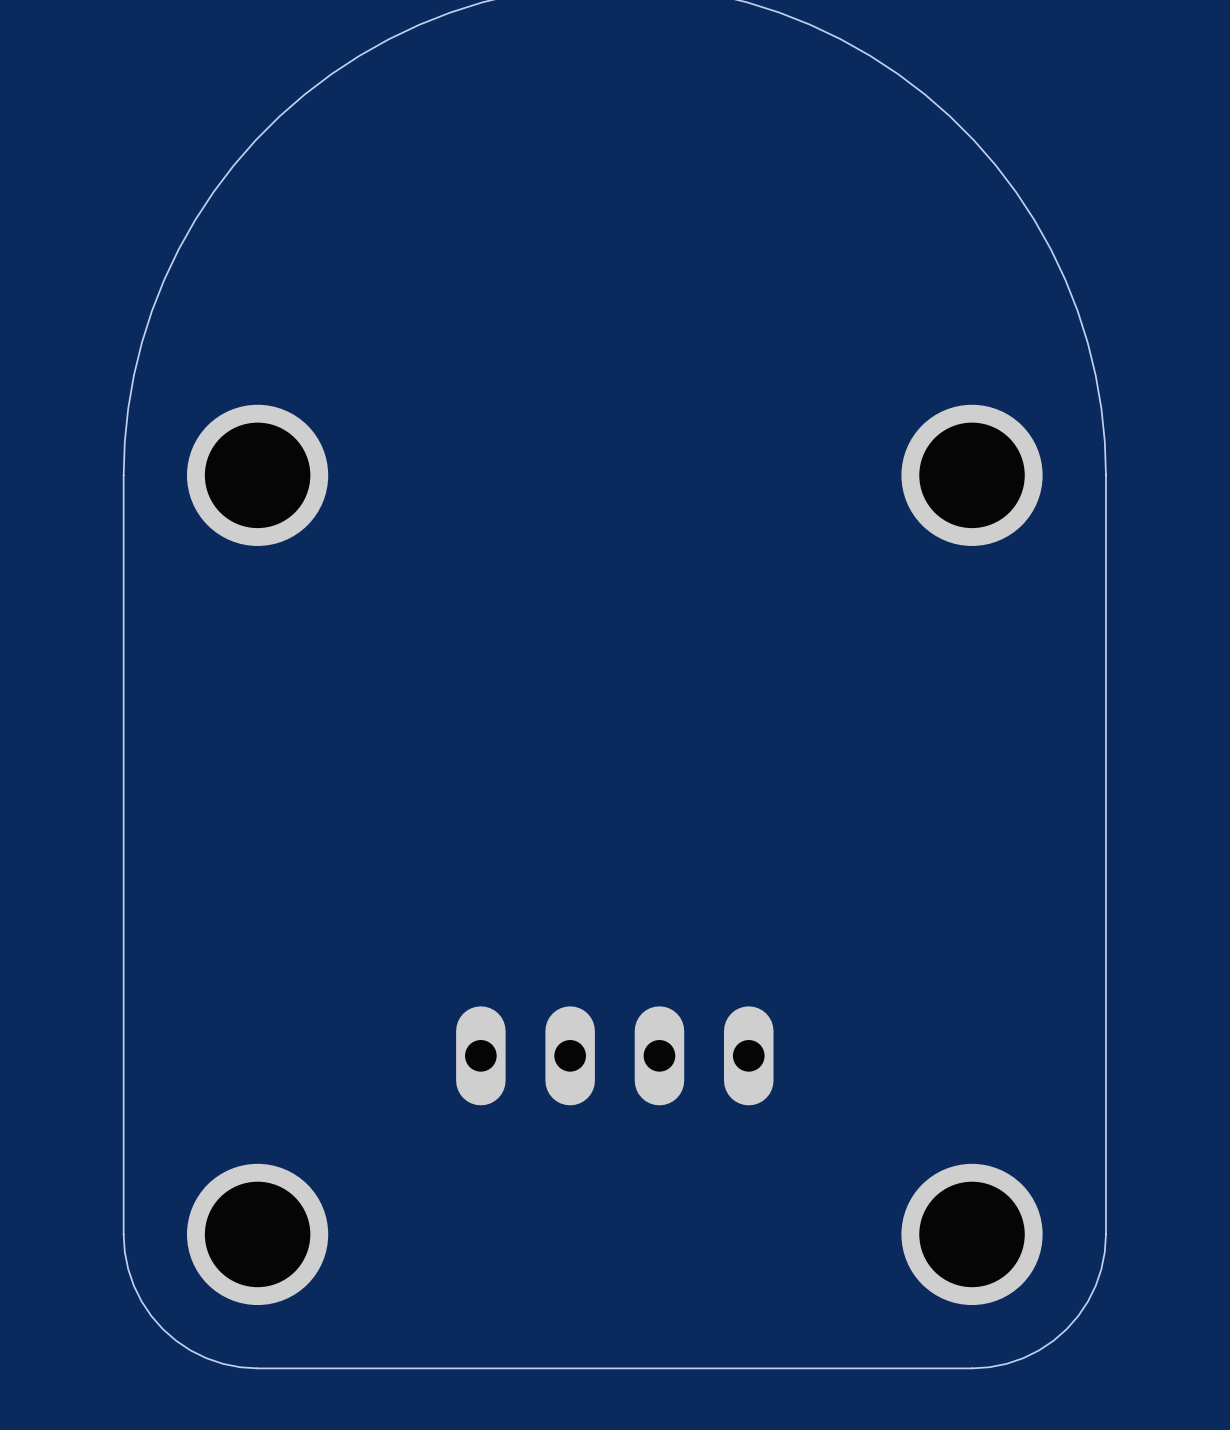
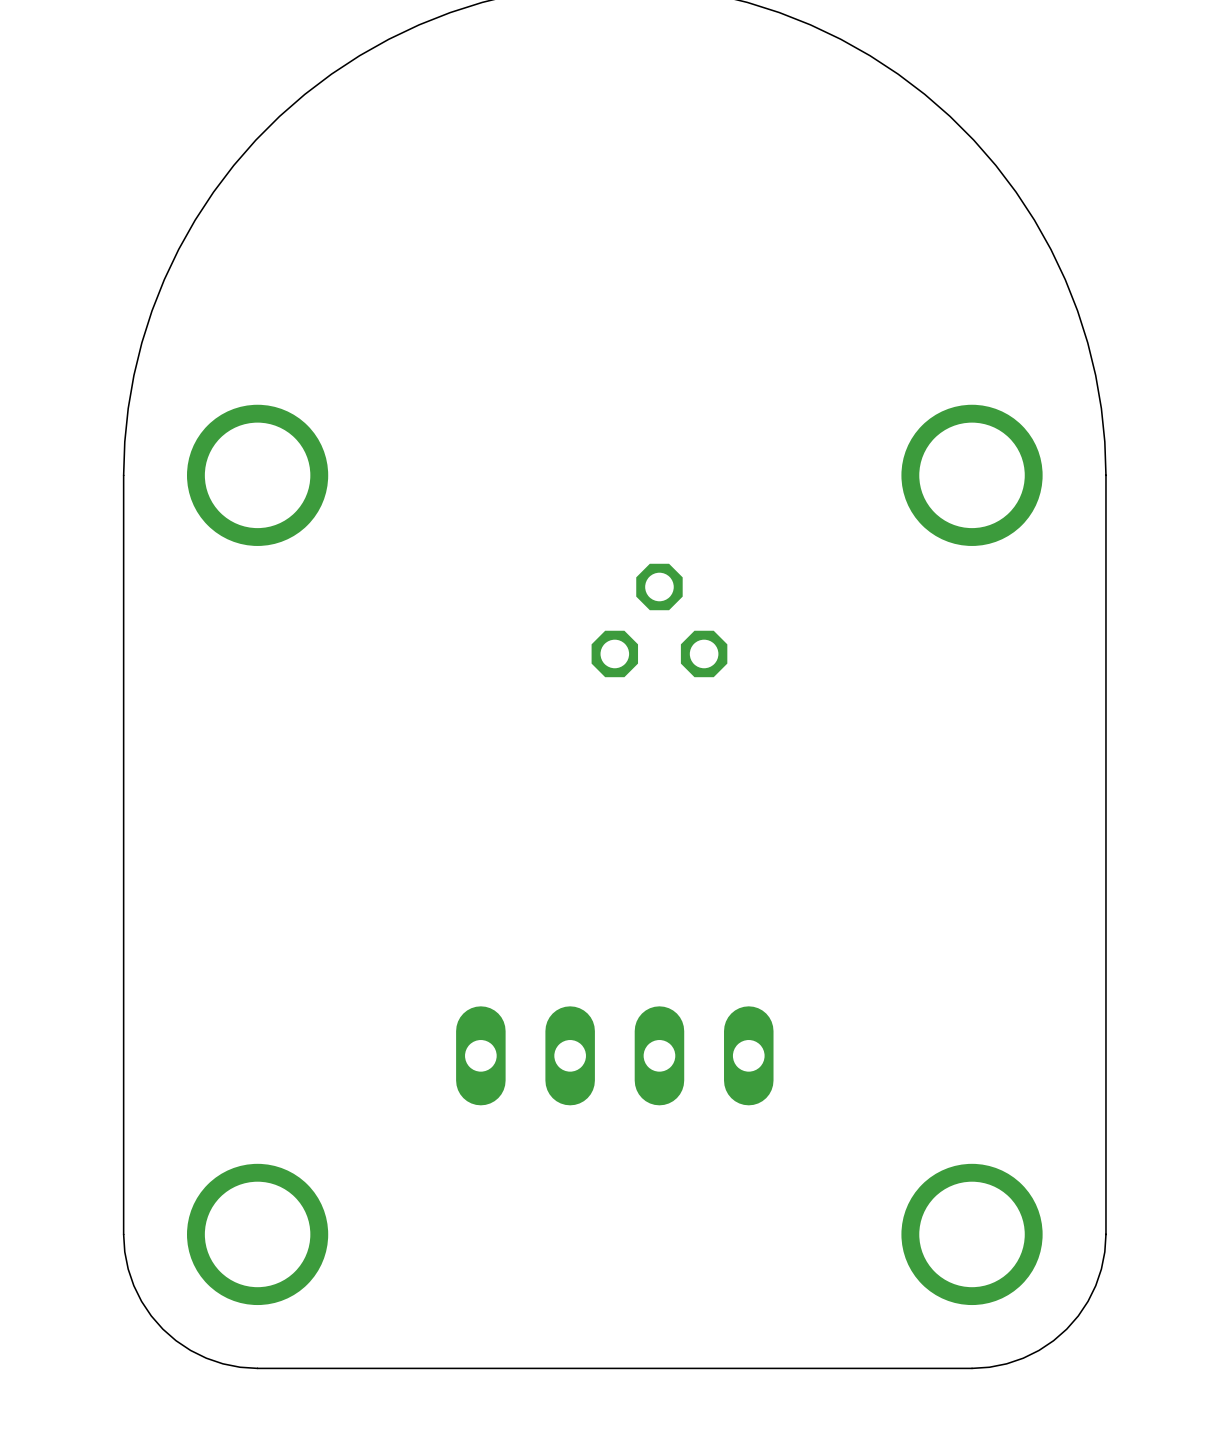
part: none -> (659, 620)

